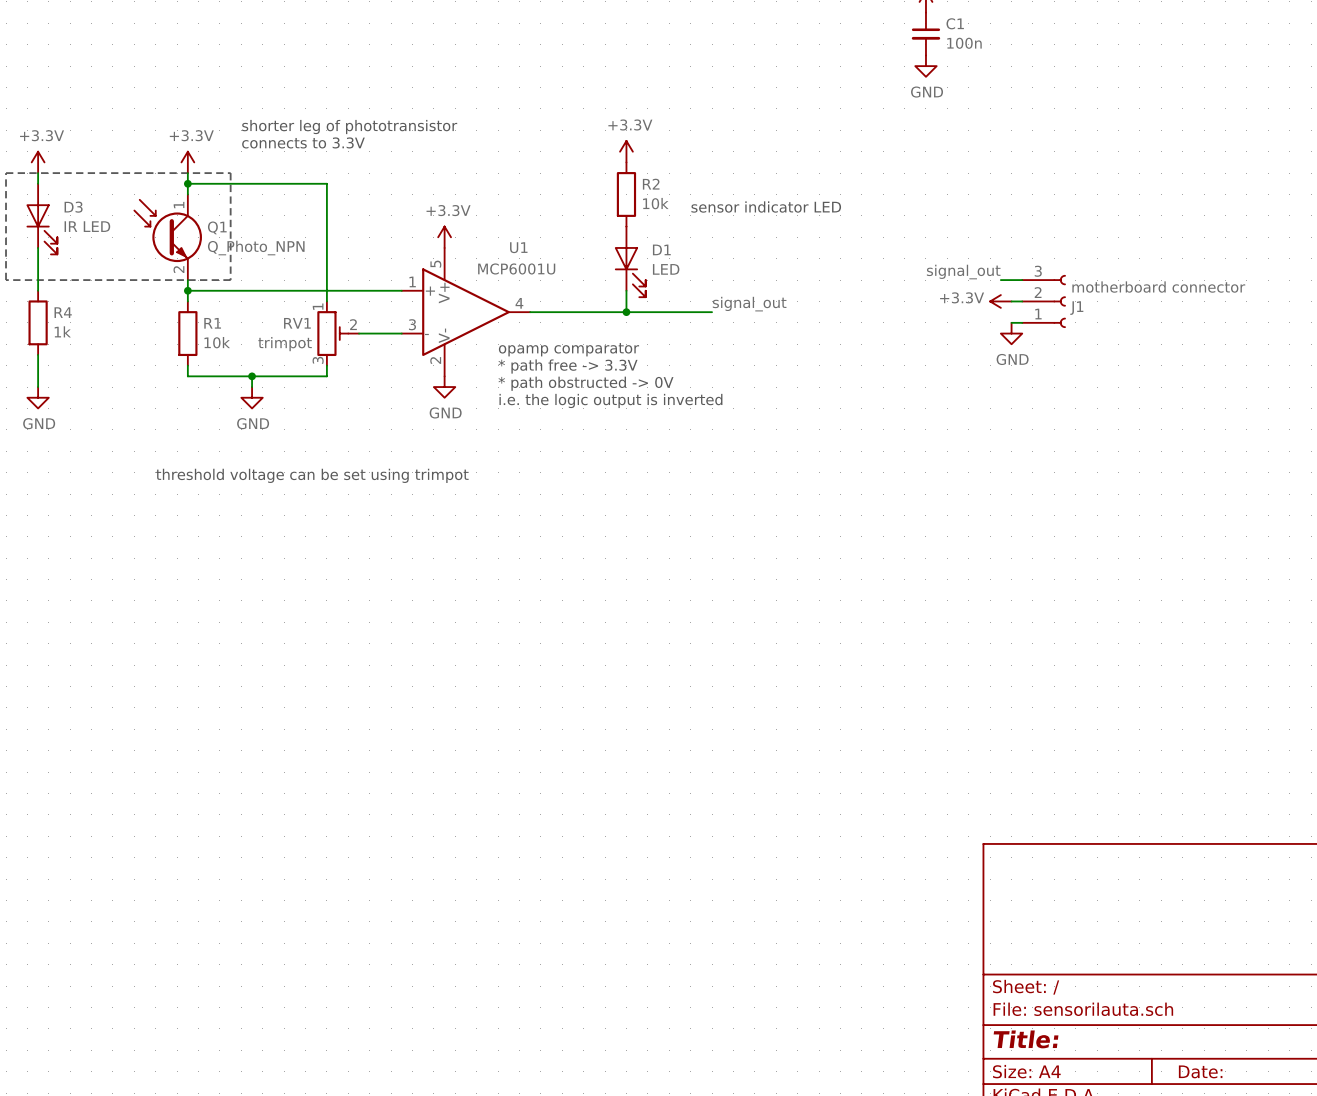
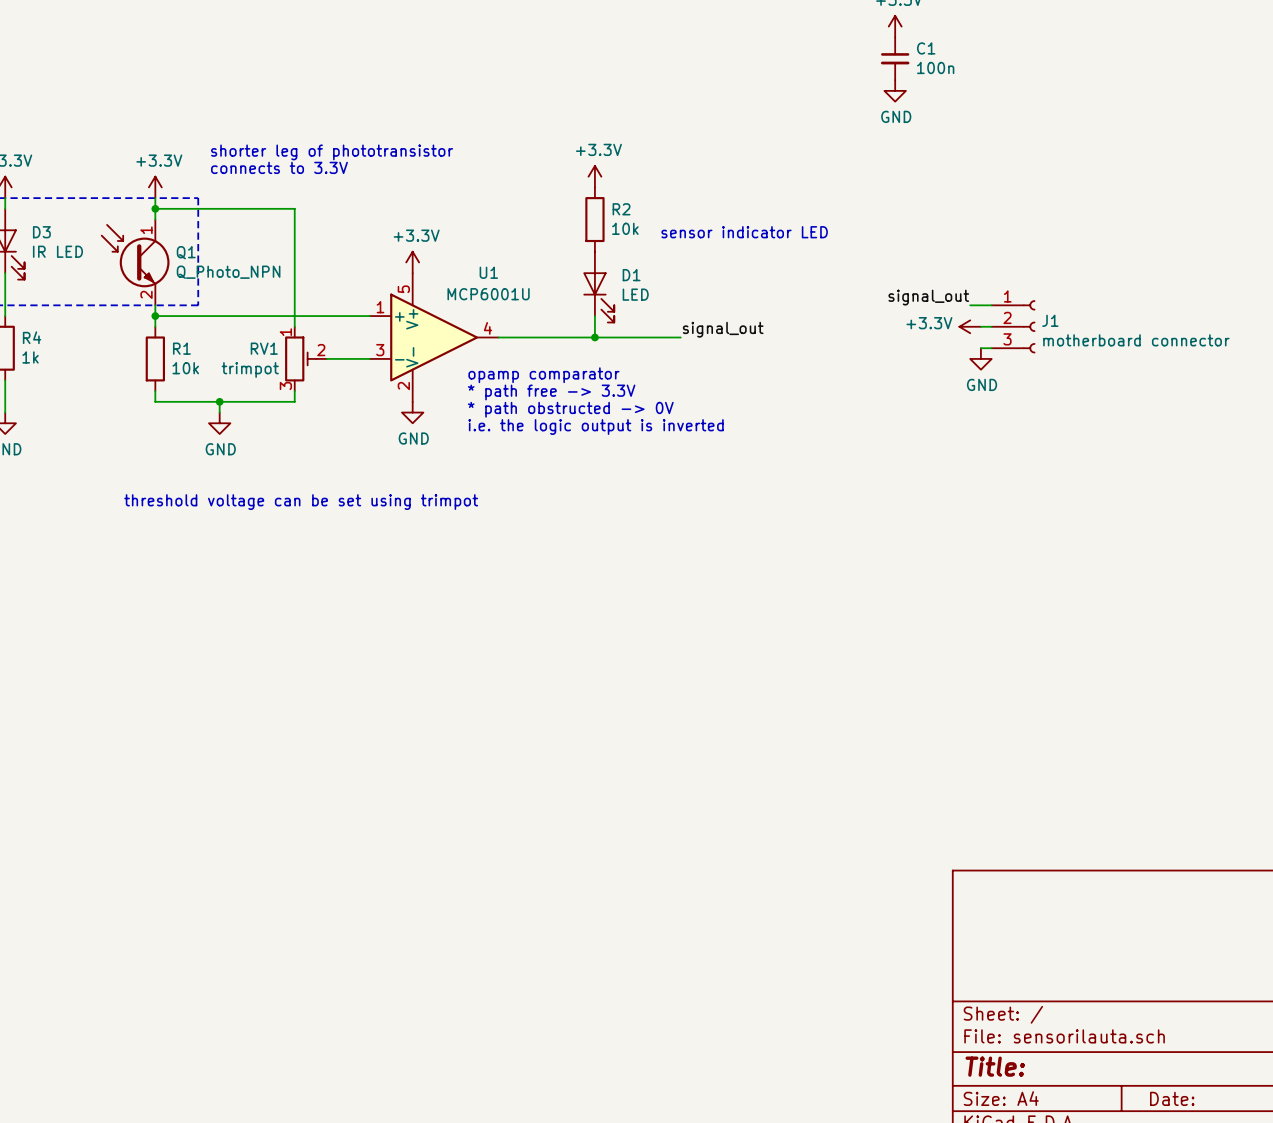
J1 flip: as is (1059, 301) -> up-down (1029, 326)

